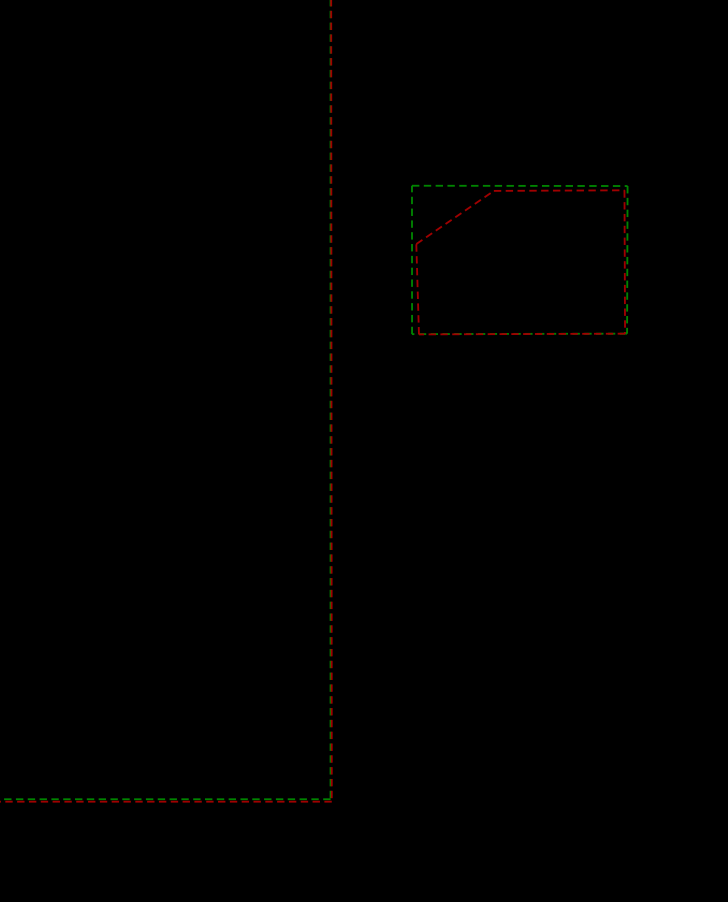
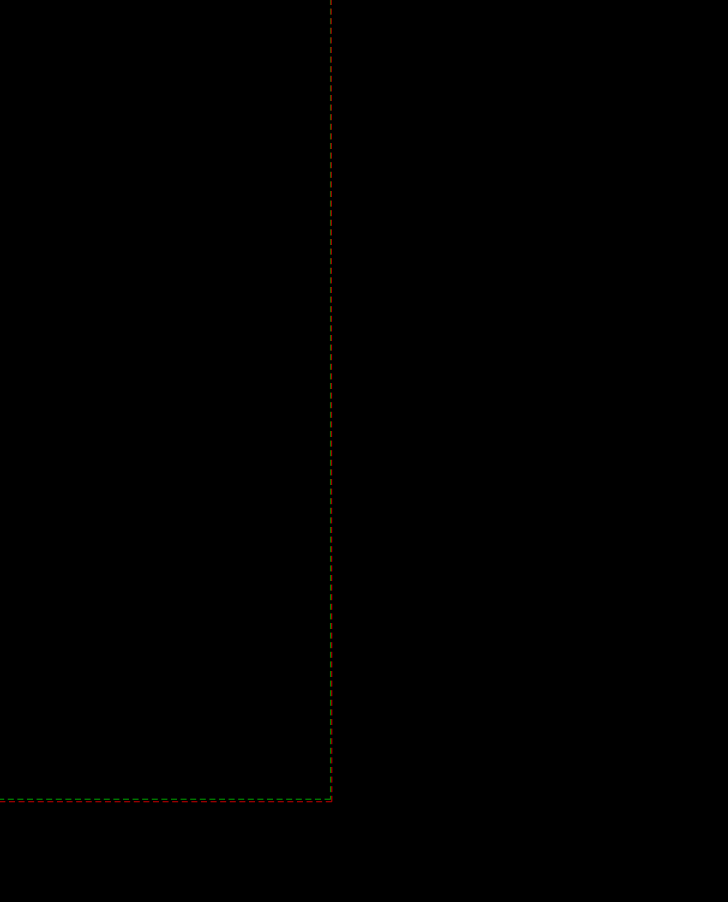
bottom zone outline: (411, 185) (412, 334) (627, 333) (627, 186) (411, 185) -> none
top zone outline: (624, 190) (493, 190) (416, 244) (418, 334) (625, 333) (624, 190) -> none

